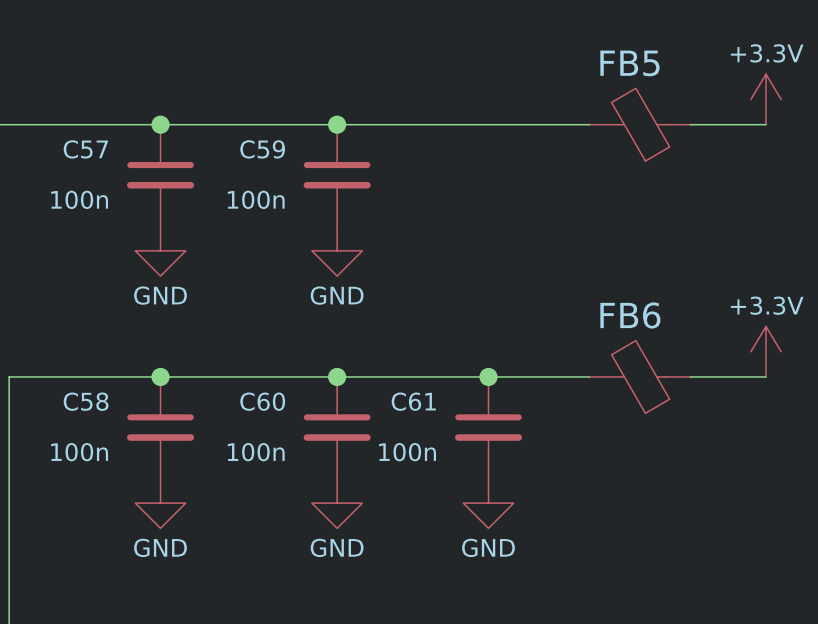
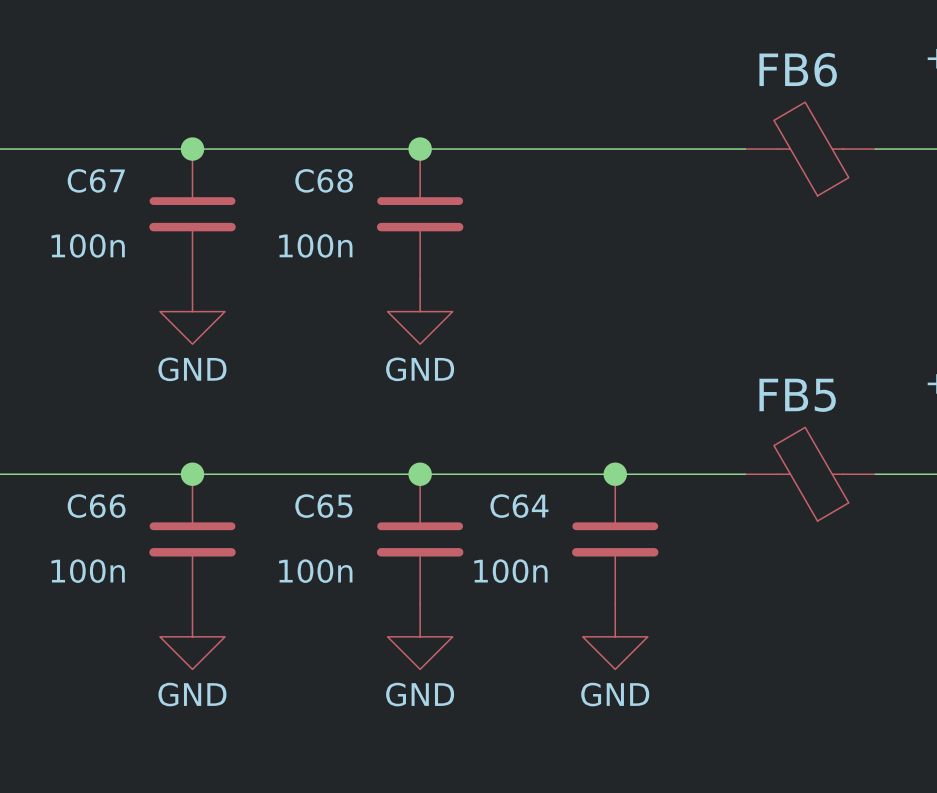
FB5 name: FB5 (629, 63) -> FB6 (798, 69)
C57 name: C57 (85, 149) -> C67 (96, 180)
C59 name: C59 (262, 149) -> C68 (324, 180)
FB6 name: FB6 (630, 315) -> FB5 (797, 395)
C58 name: C58 (86, 401) -> C66 (96, 506)
C60 name: C60 (262, 401) -> C65 (323, 506)
C61 name: C61 (413, 401) -> C64 (519, 506)

